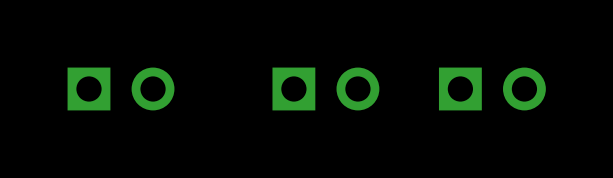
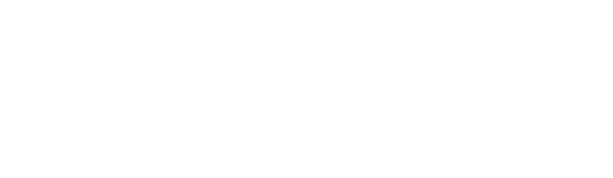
part: (121, 88) -> none
part: (325, 88) -> none
part: (492, 88) -> none

